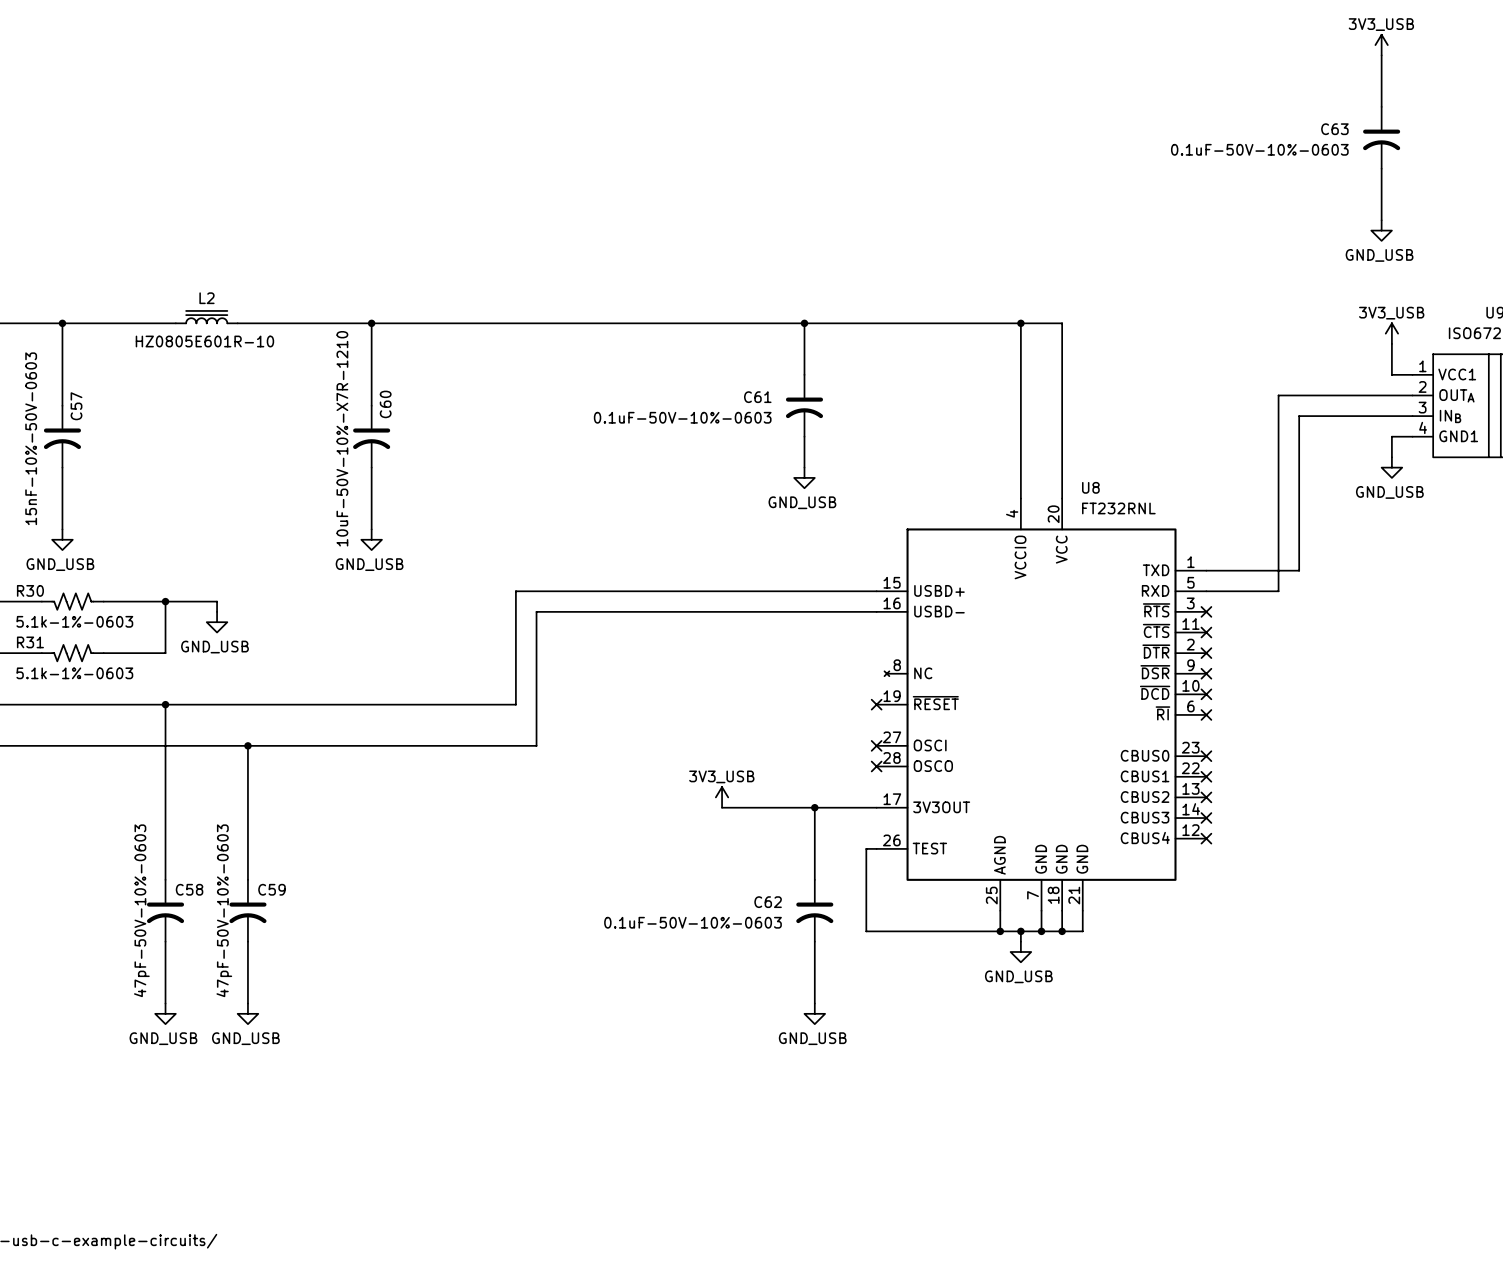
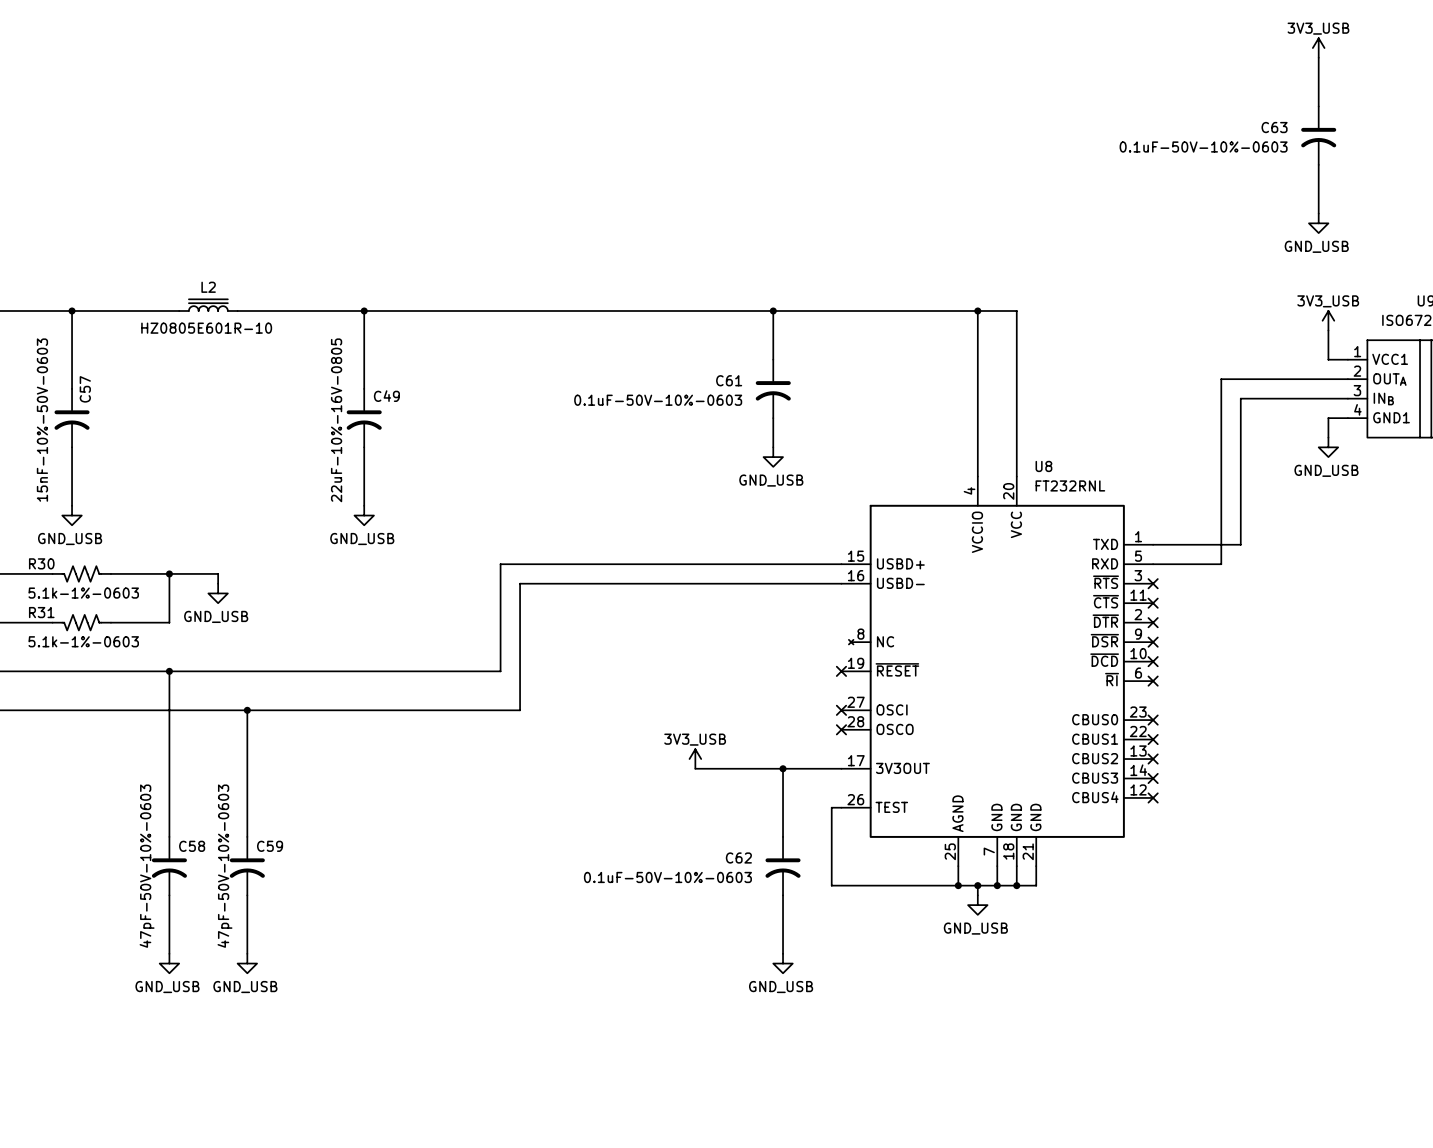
C60 name: C60 (385, 404) -> C49 (386, 396)
C60 value: 10uF-50V-10%-X7R-1210 (342, 438) -> 22uF-10%-16V-0805 (336, 420)

